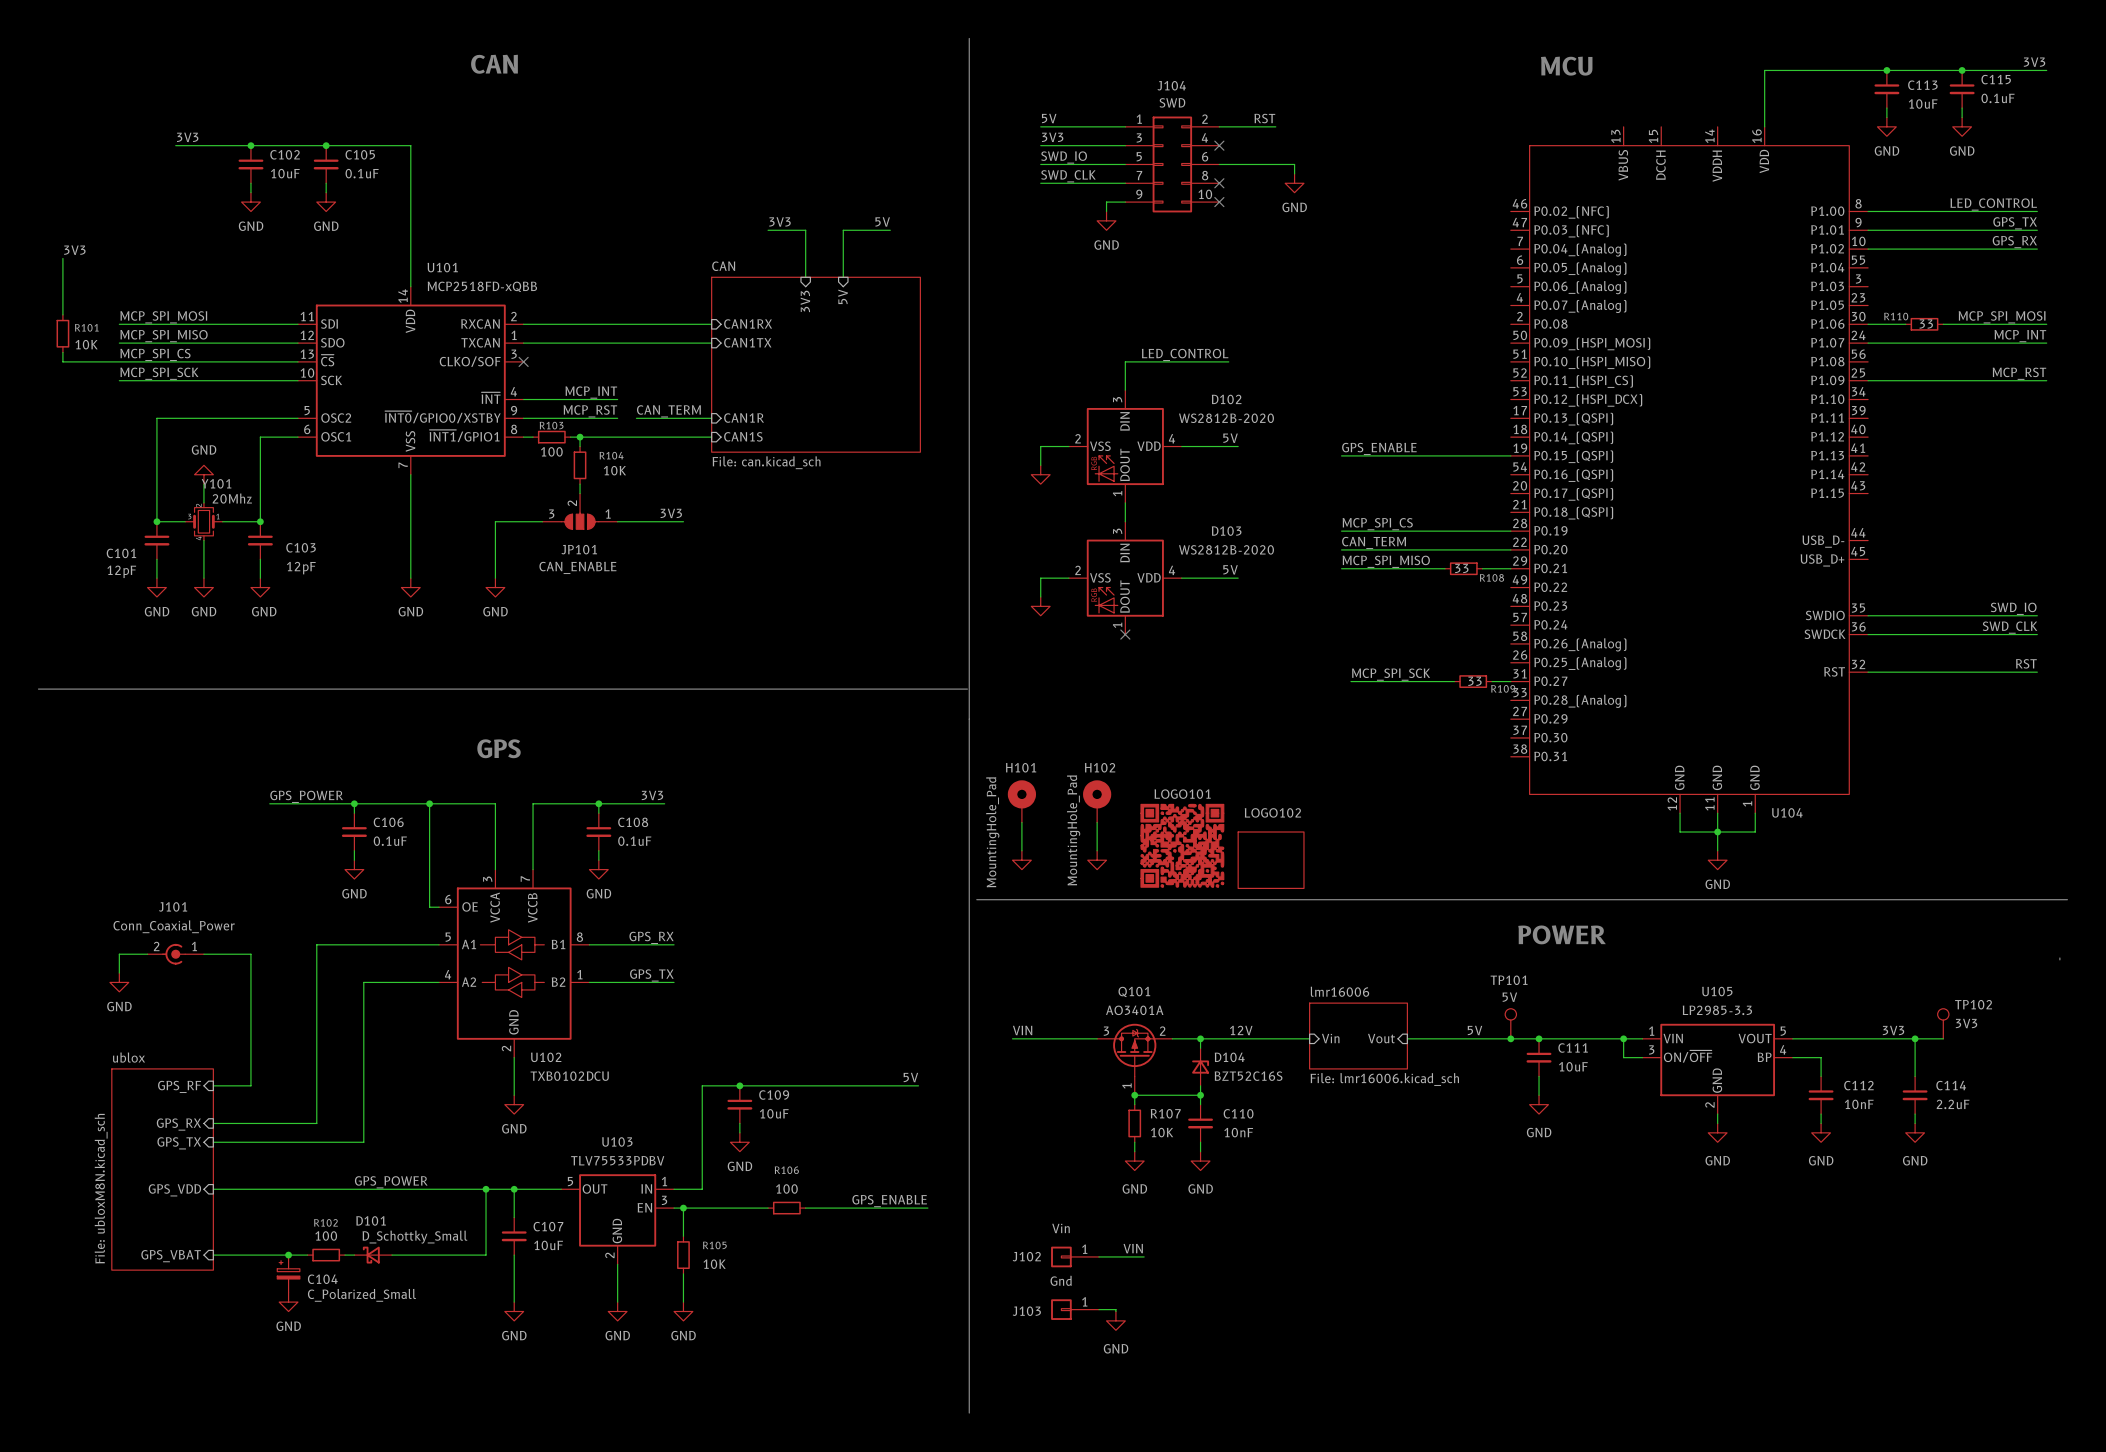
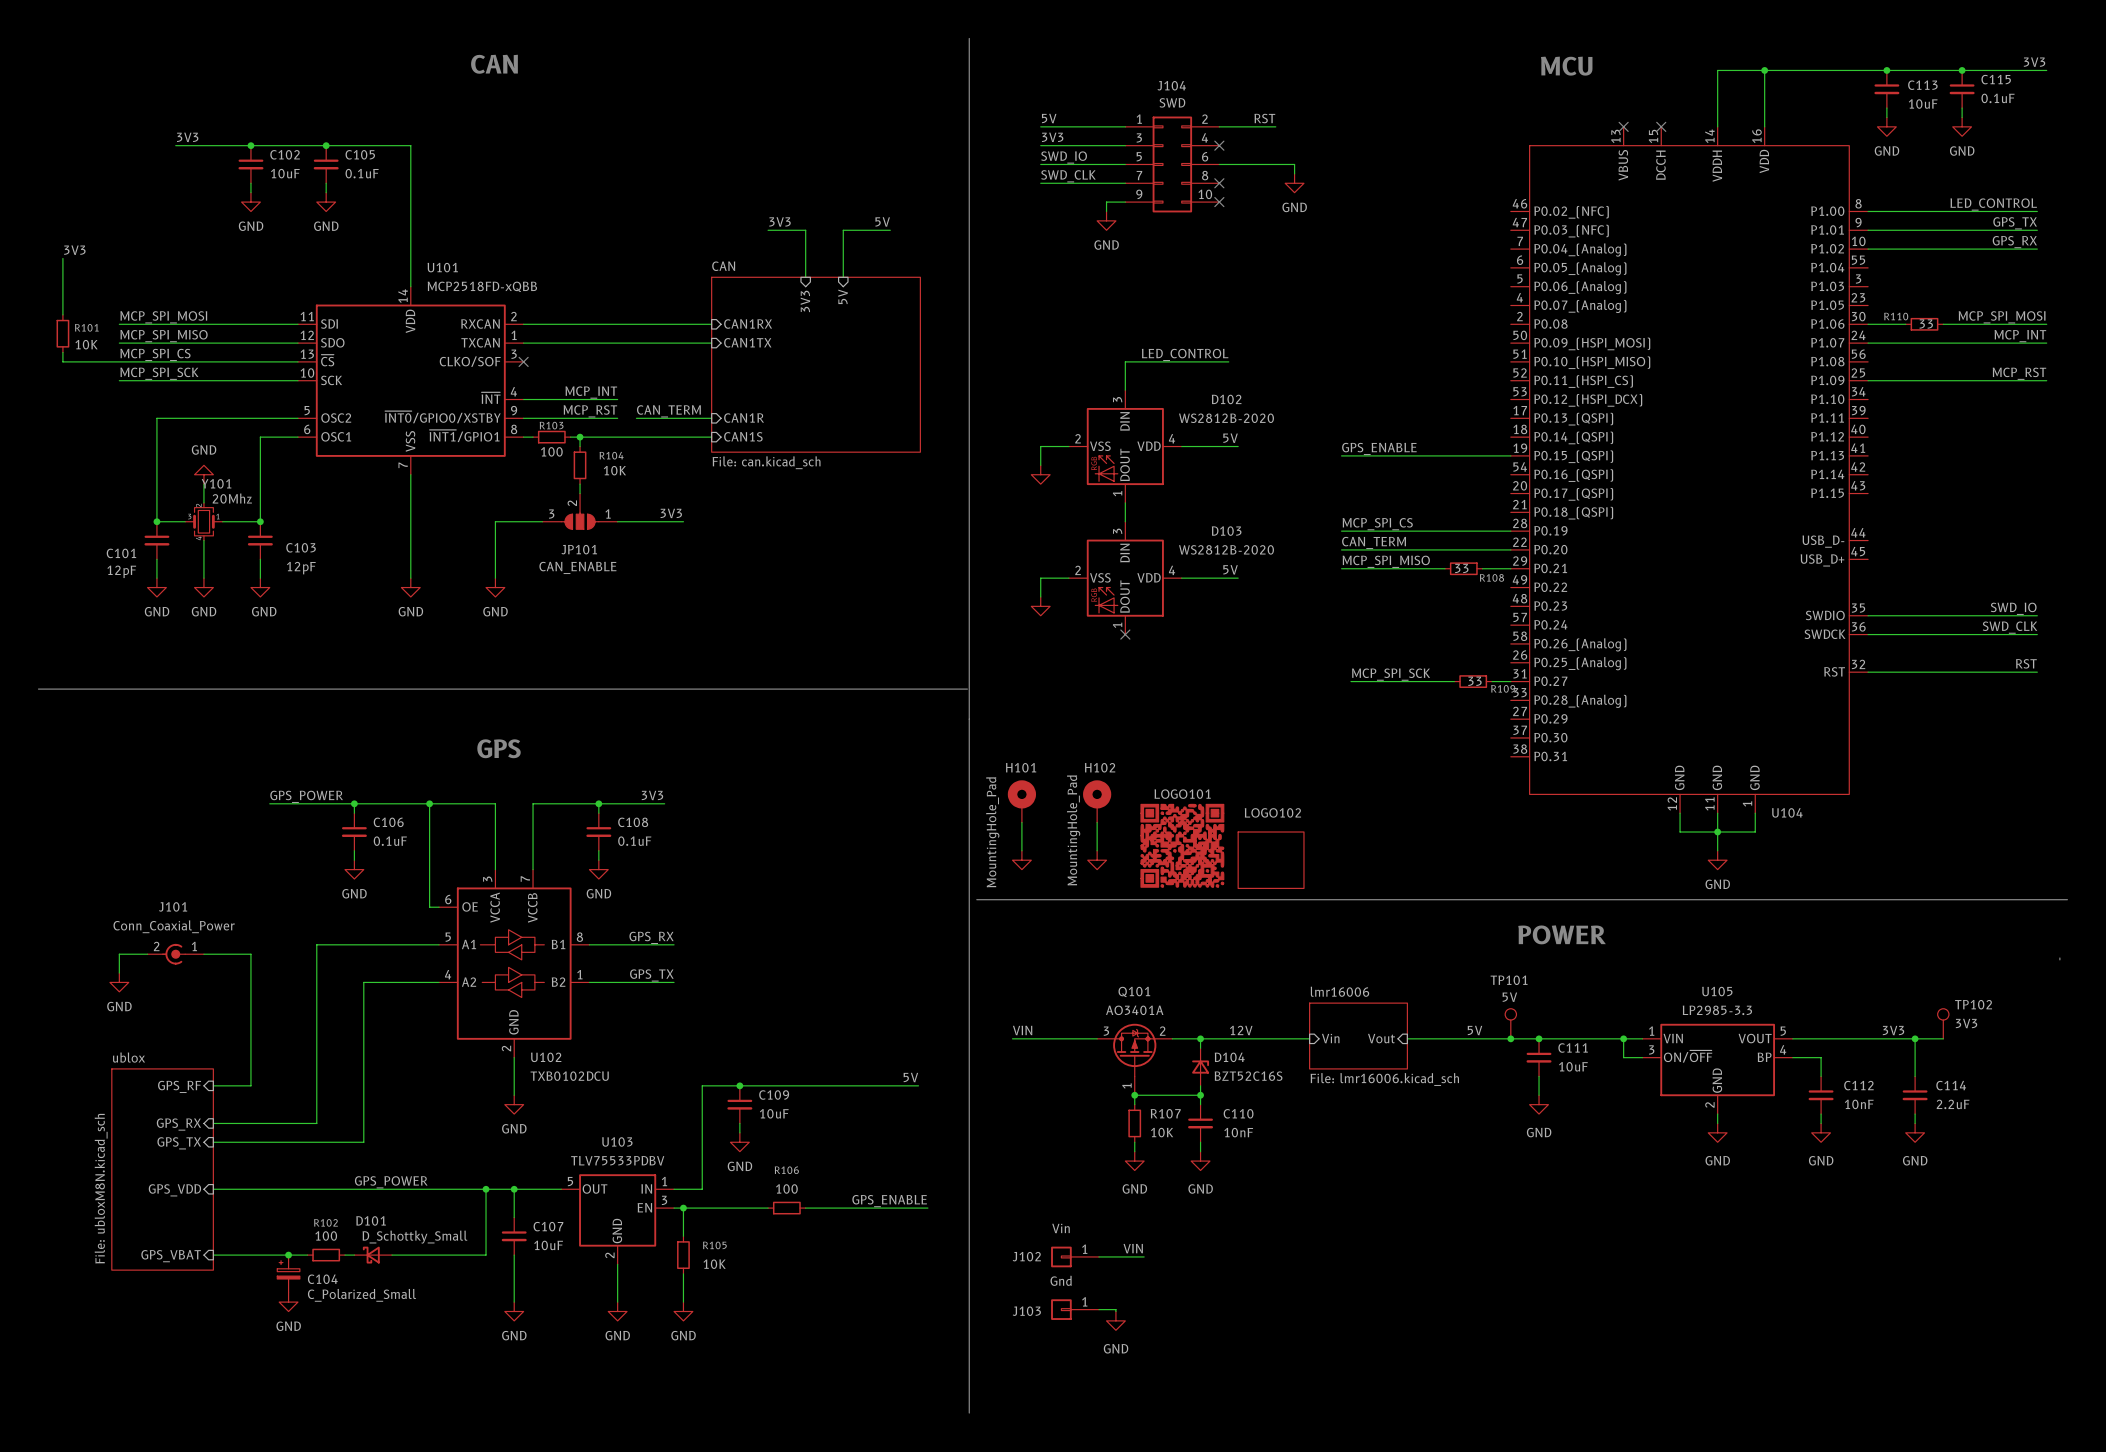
wire: none -> (1764, 70) (1717, 70) (1717, 126)
junction: none -> (1764, 70)
no-connect mark: none -> (1623, 126)
no-connect mark: none -> (1661, 126)

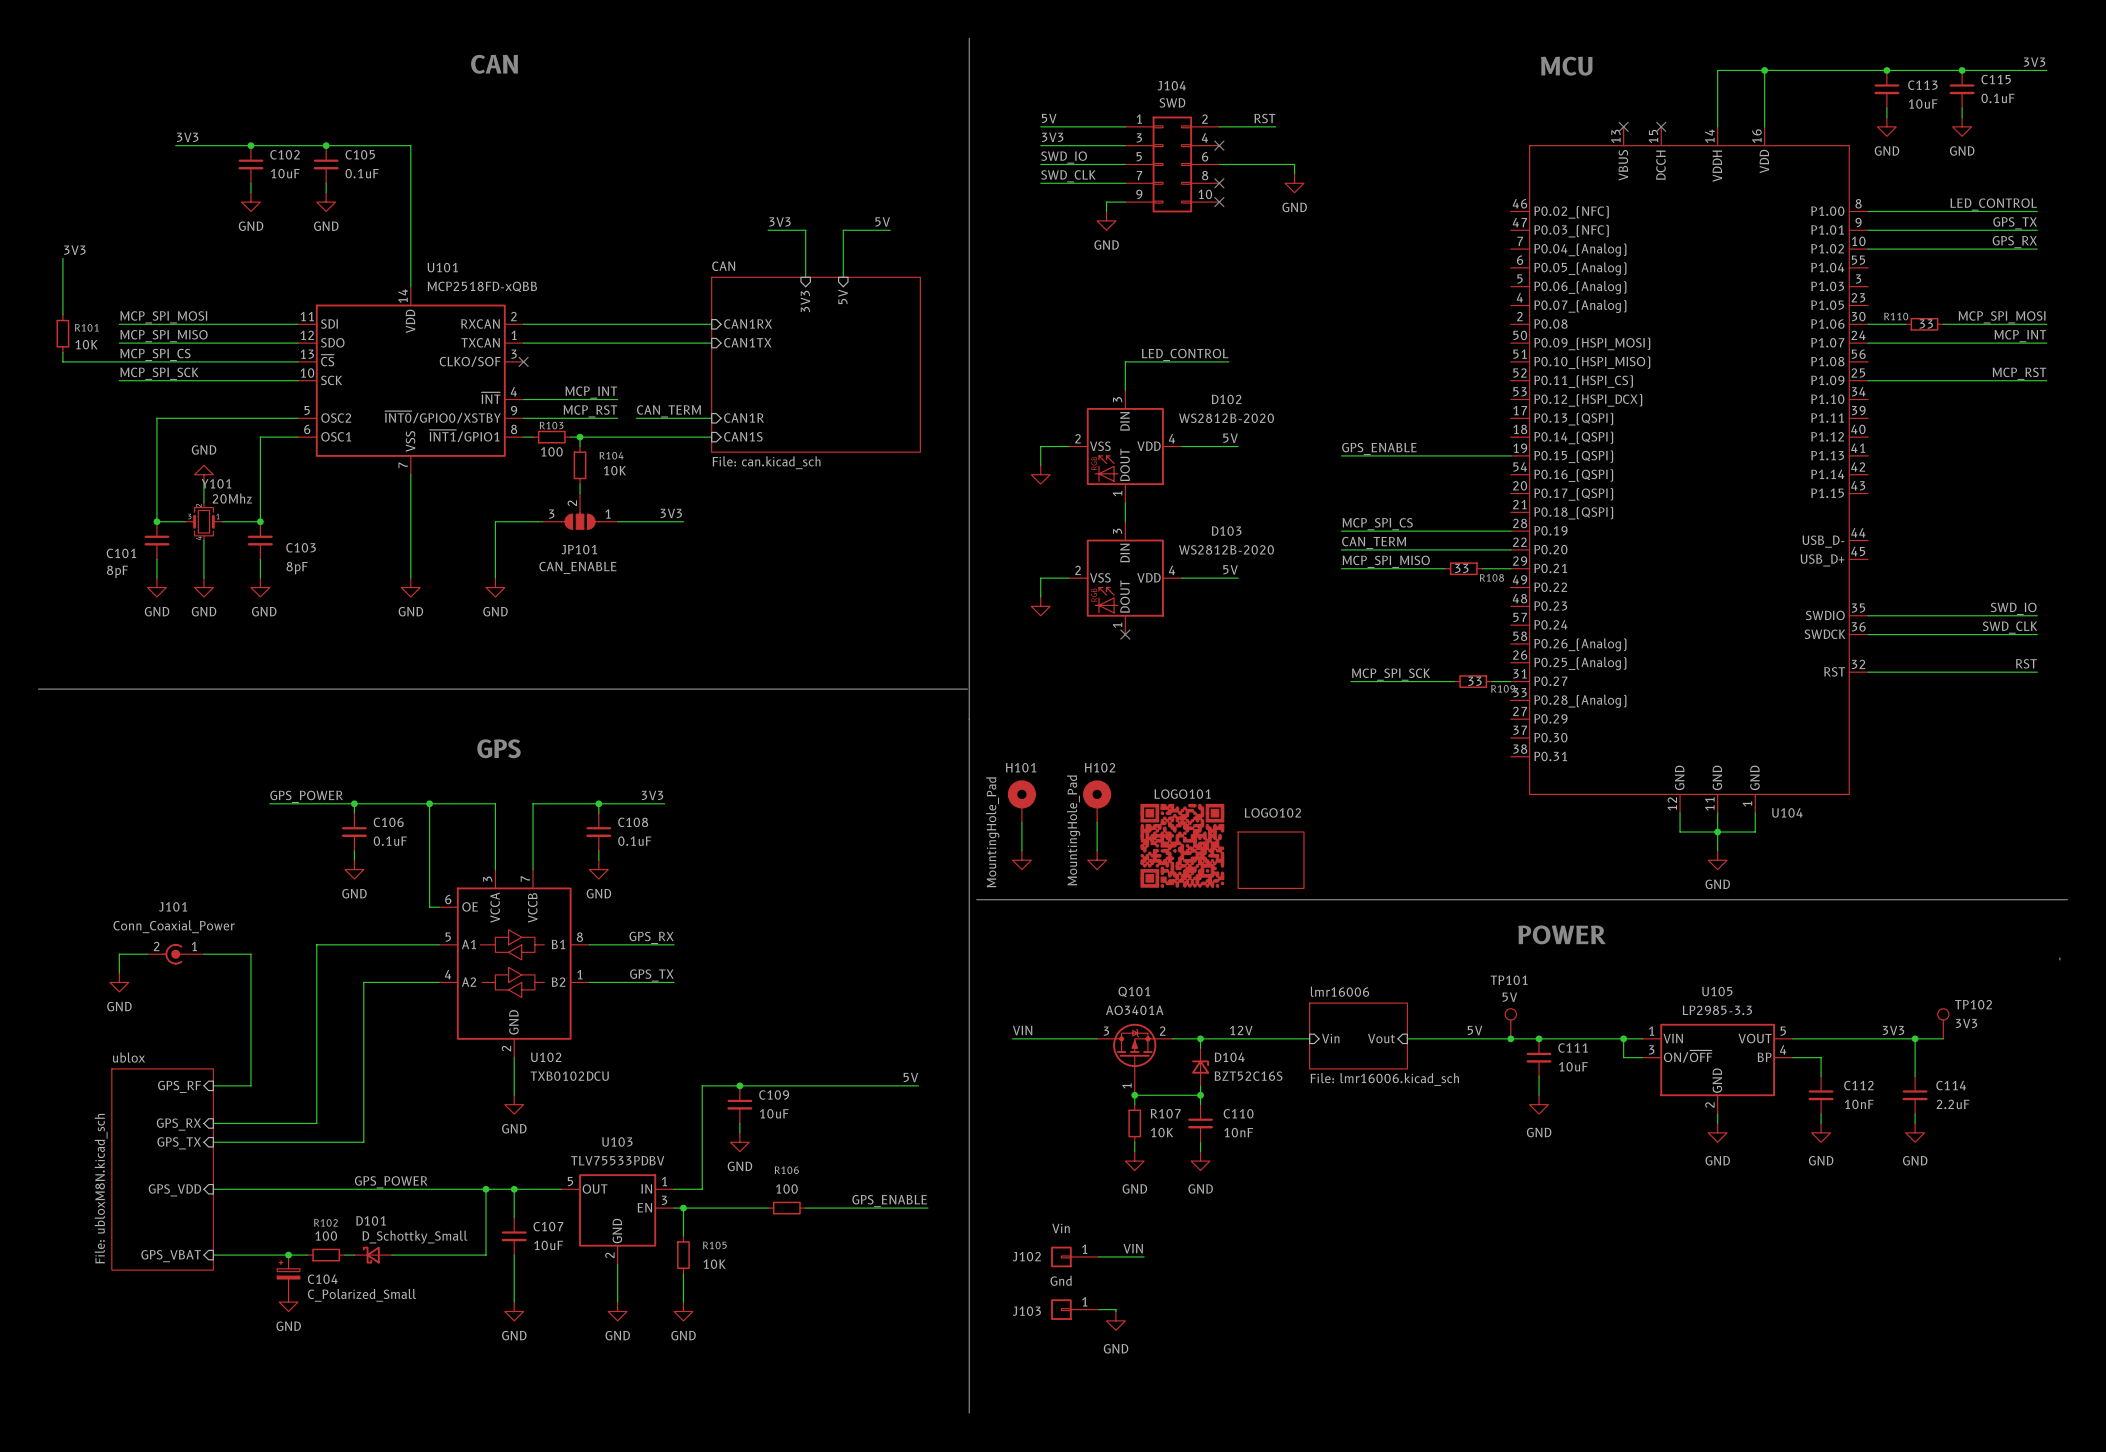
C103 value: 12pF (301, 568) -> 8pF (297, 568)
C101 value: 12pF (121, 571) -> 8pF (117, 571)

